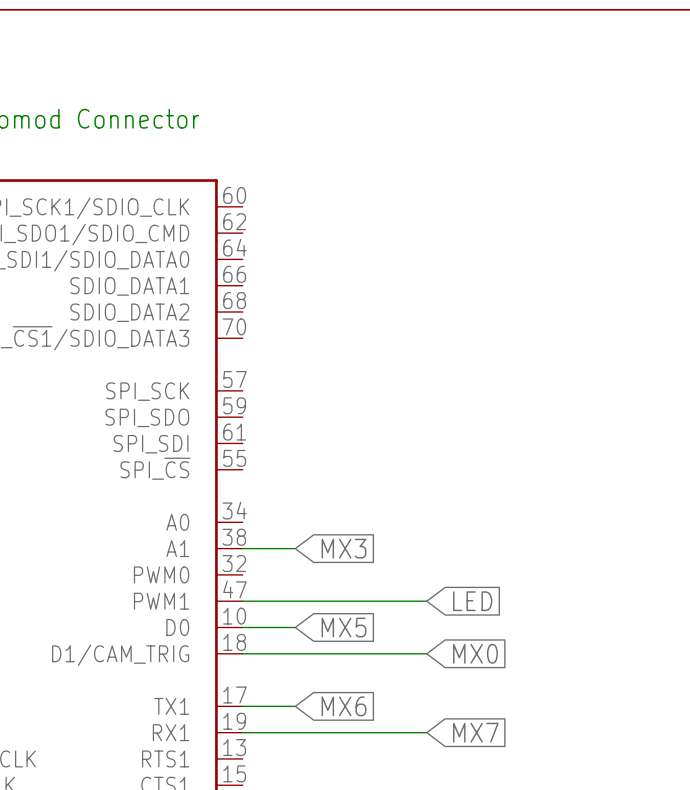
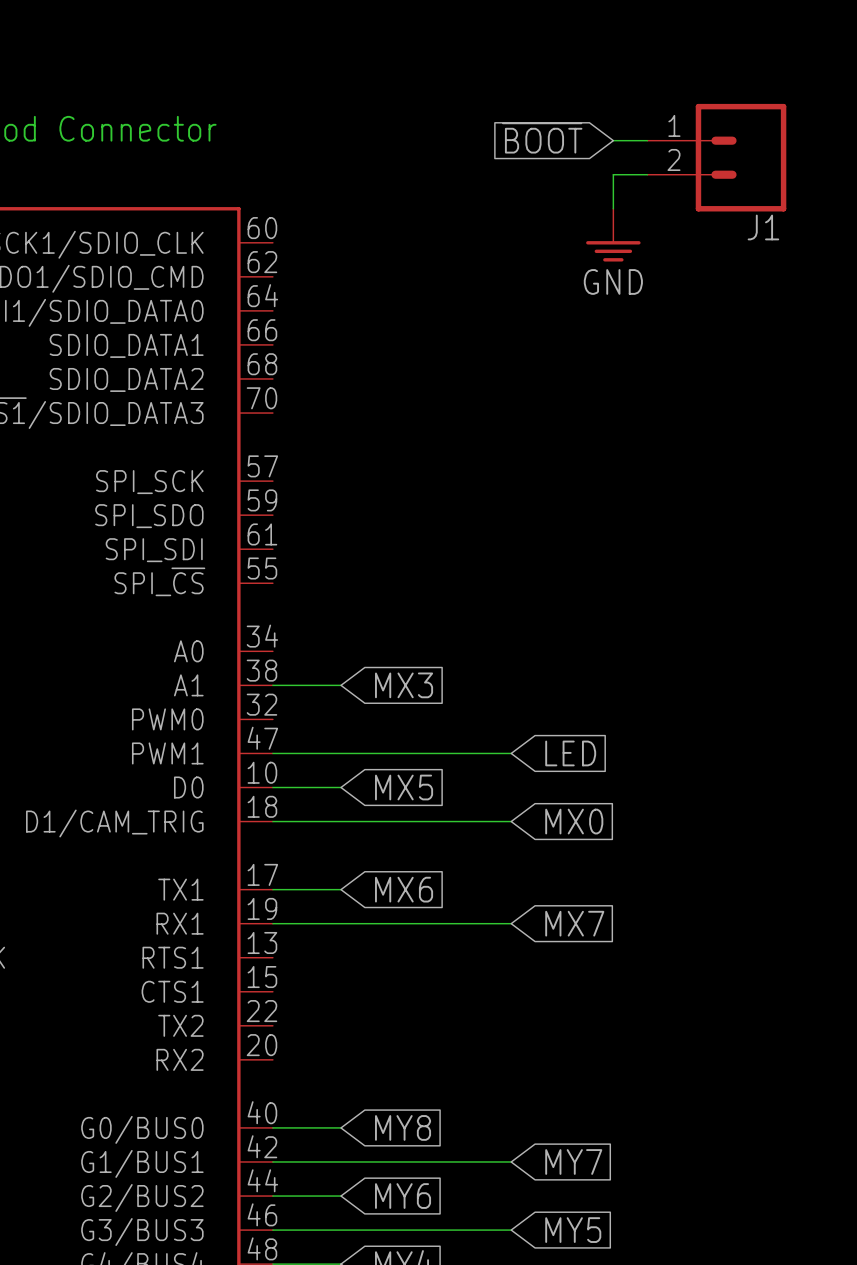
global label: none -> ~{BOOT} (542, 137)
wire: none -> (613, 140) (647, 140)
J1: none -> (716, 157)
wire: none -> (647, 174) (613, 174) (613, 208)
power symbol: none -> GND (613, 235)

